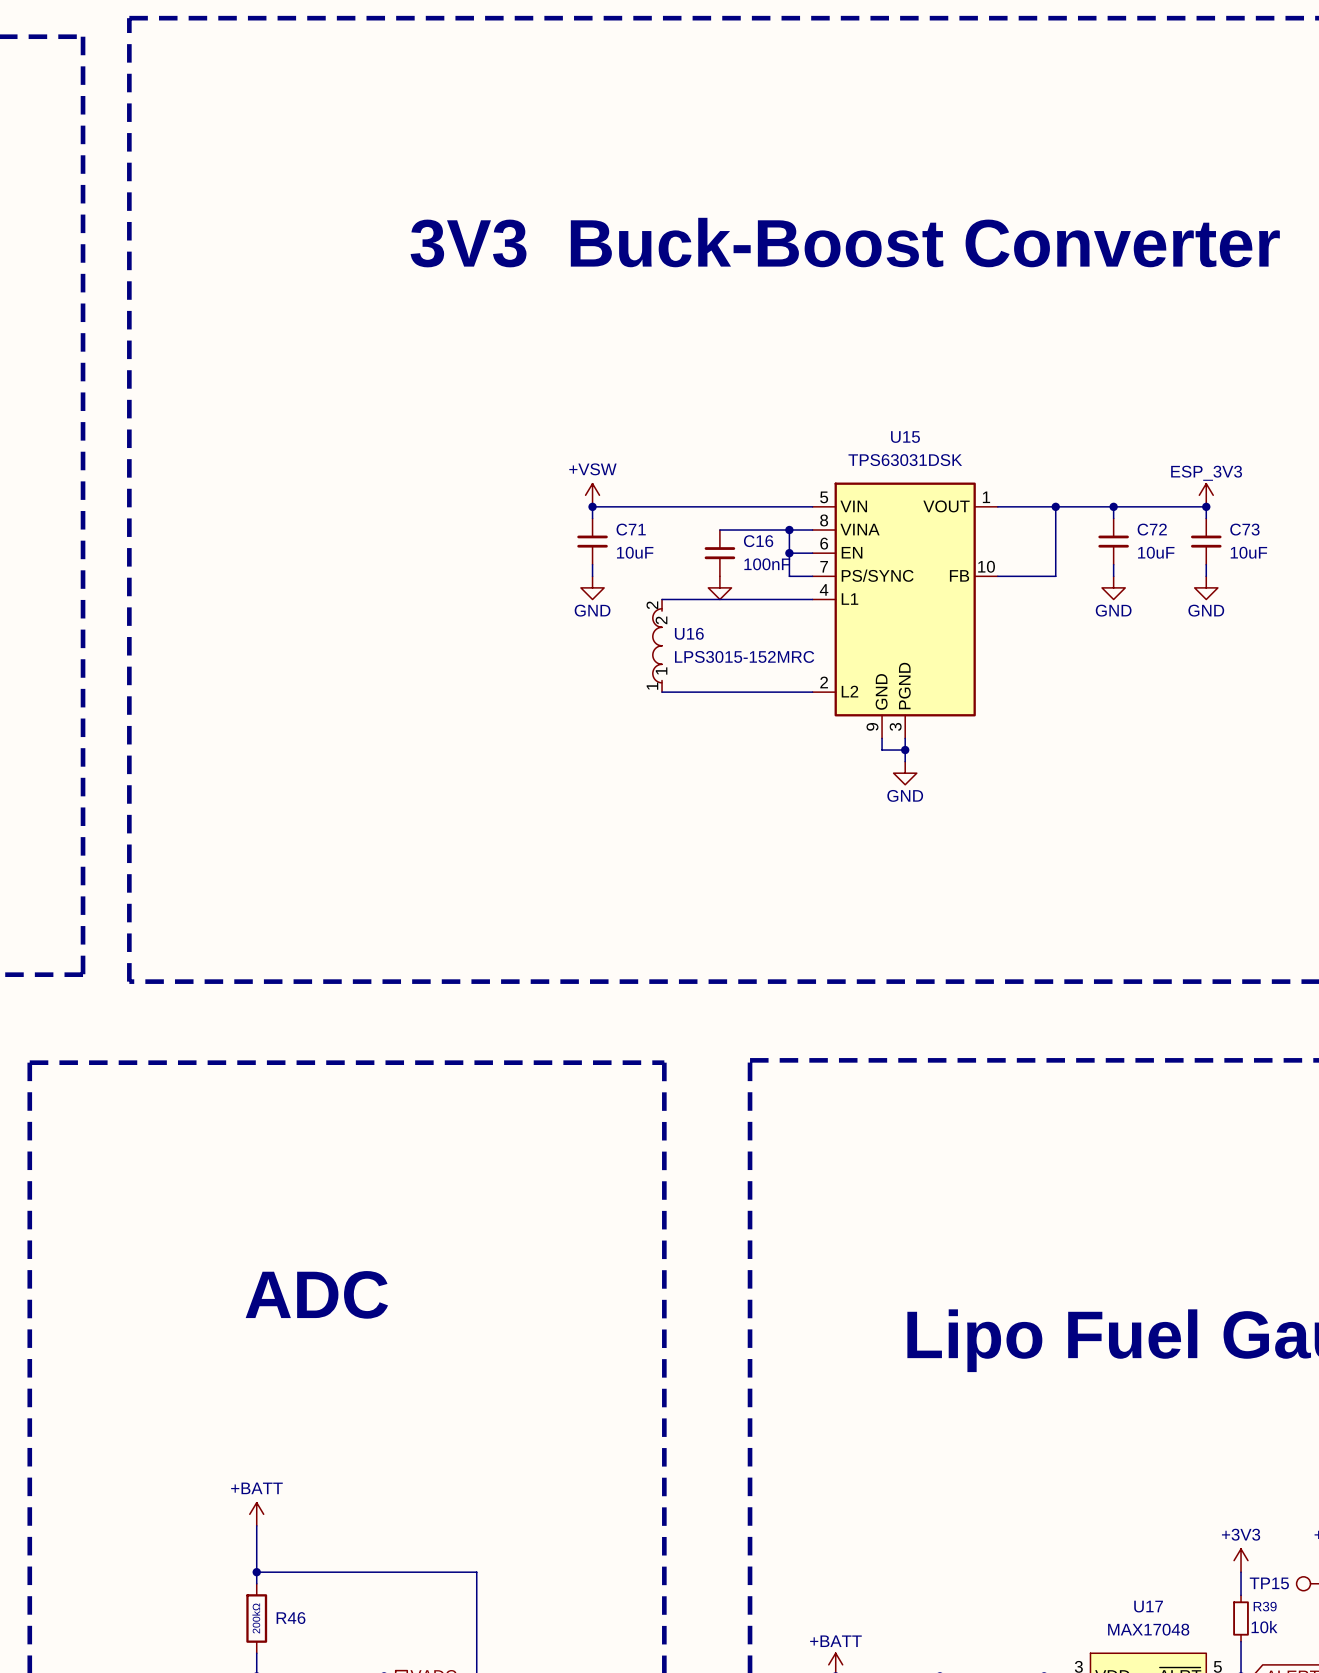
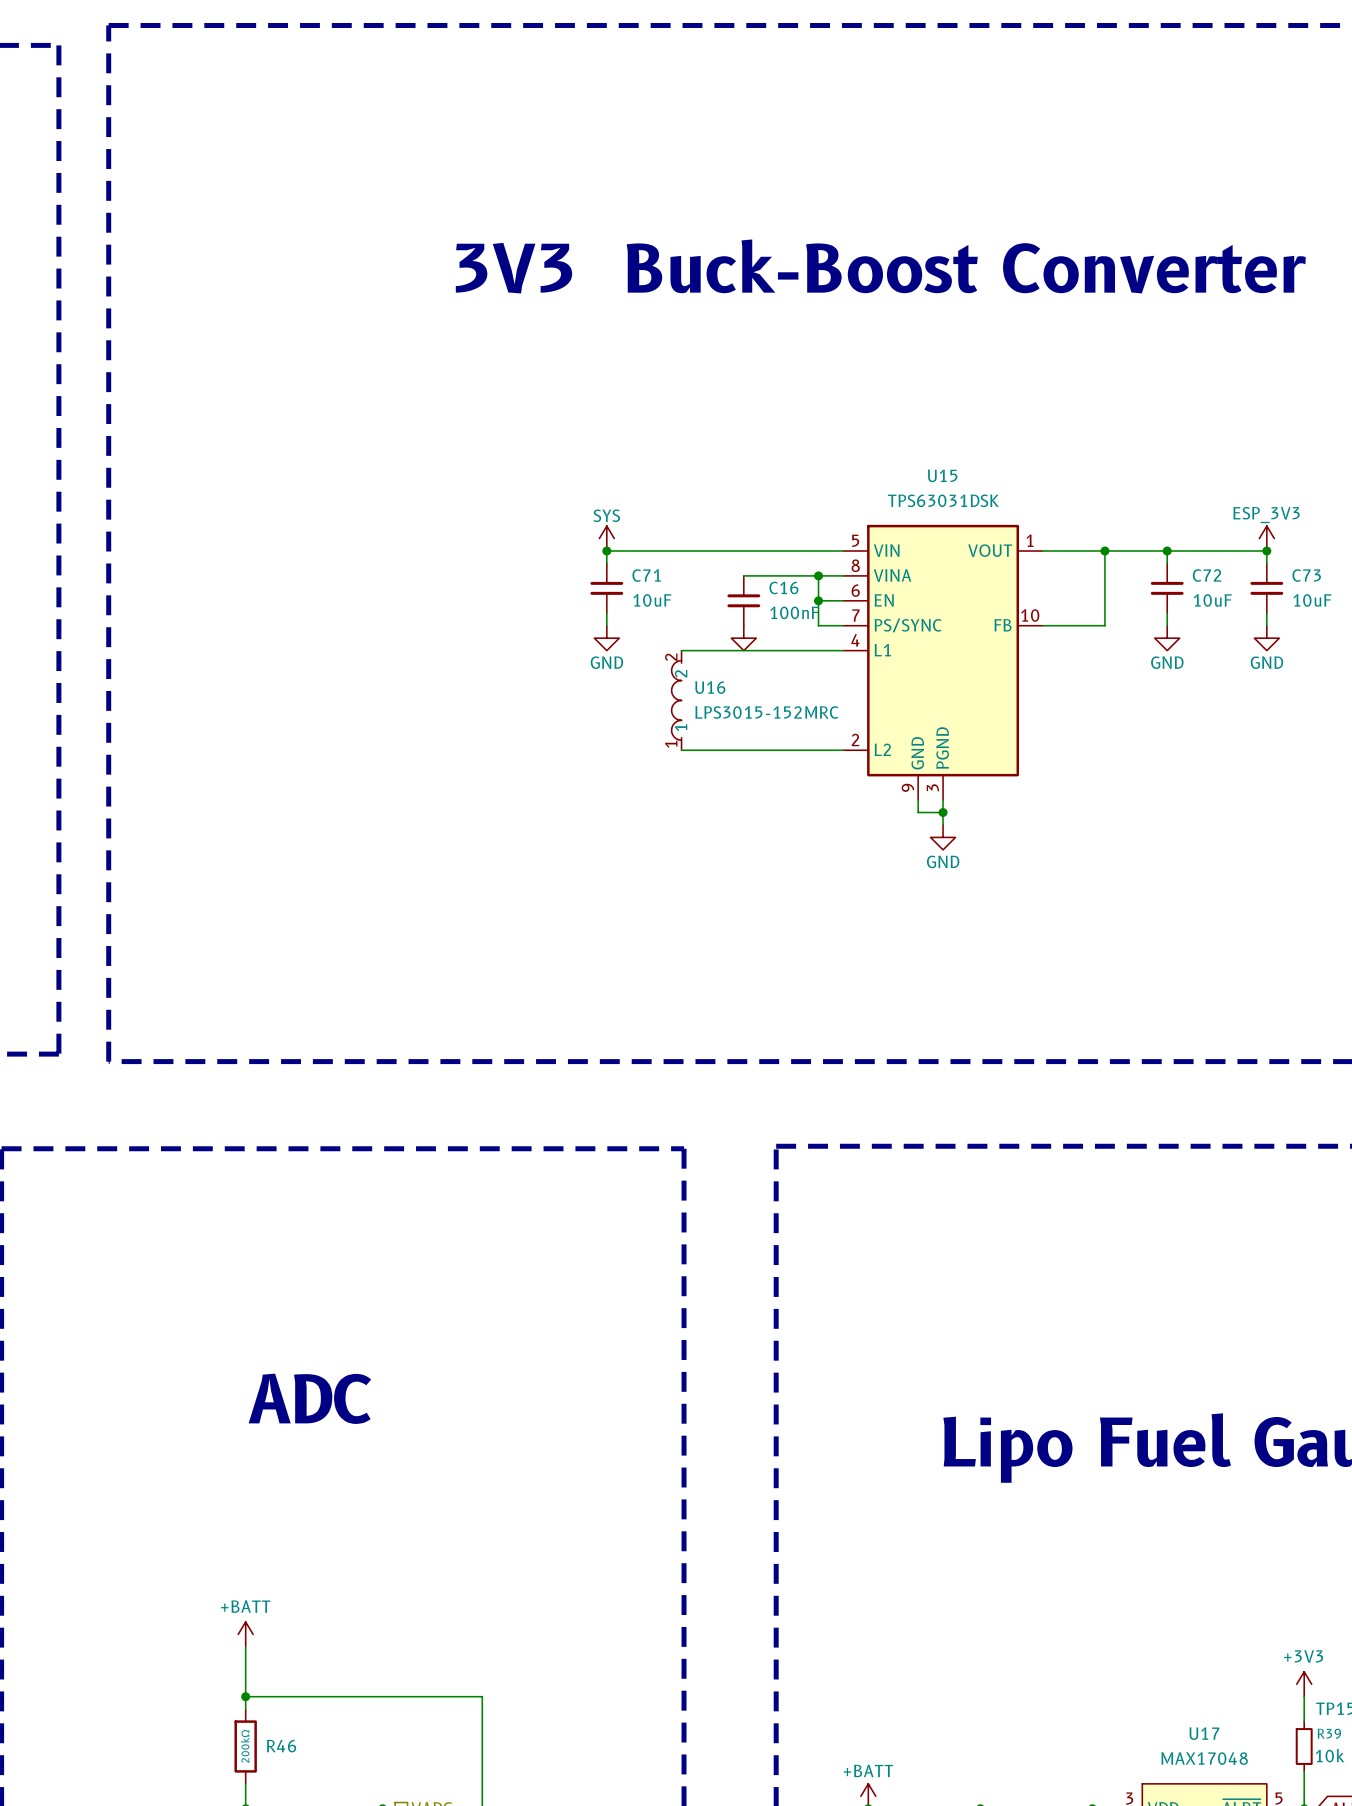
power symbol: +VSW (592, 495) -> SYS (606, 538)

